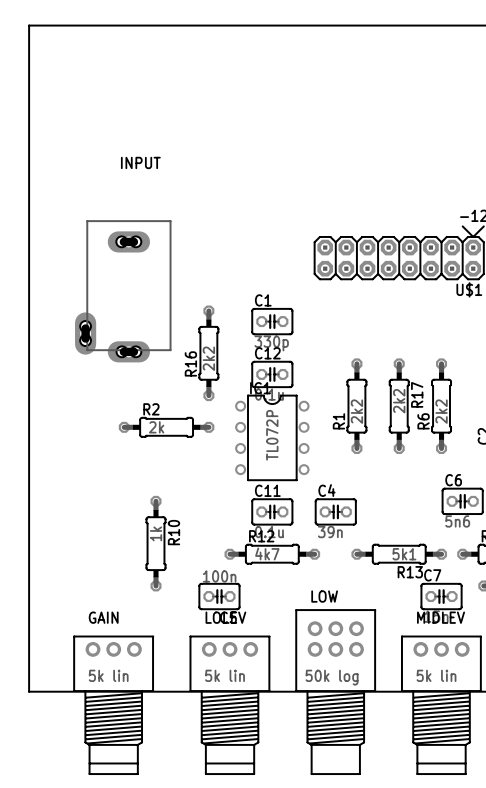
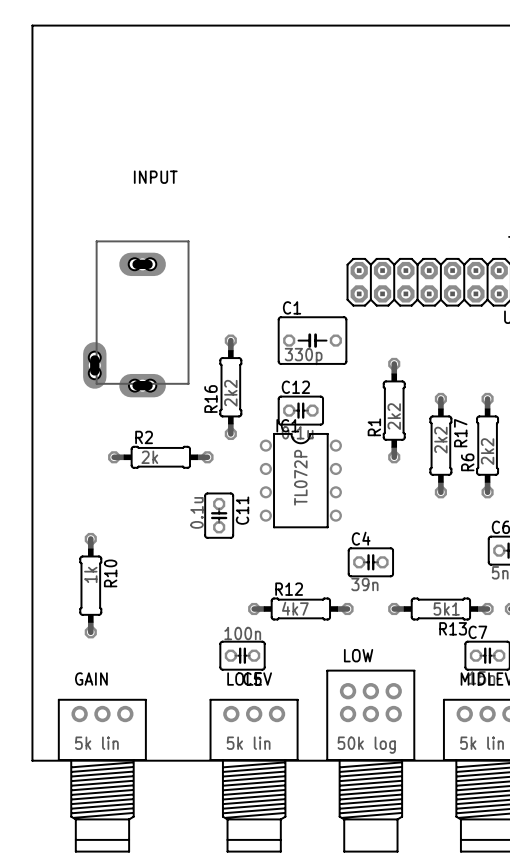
C1 footprint: [251, 308, 294, 335] -> [277, 316, 348, 365]
R1 position: (356, 406) -> (394, 410)
R2 position: (166, 427) -> (160, 457)
C11 rotation: 0° (272, 511) -> 90° clockwise (219, 515)
C11 position: (272, 511) -> (219, 515)
R10 position: (156, 543) -> (90, 585)
GAIN position: (113, 705) -> (102, 775)

